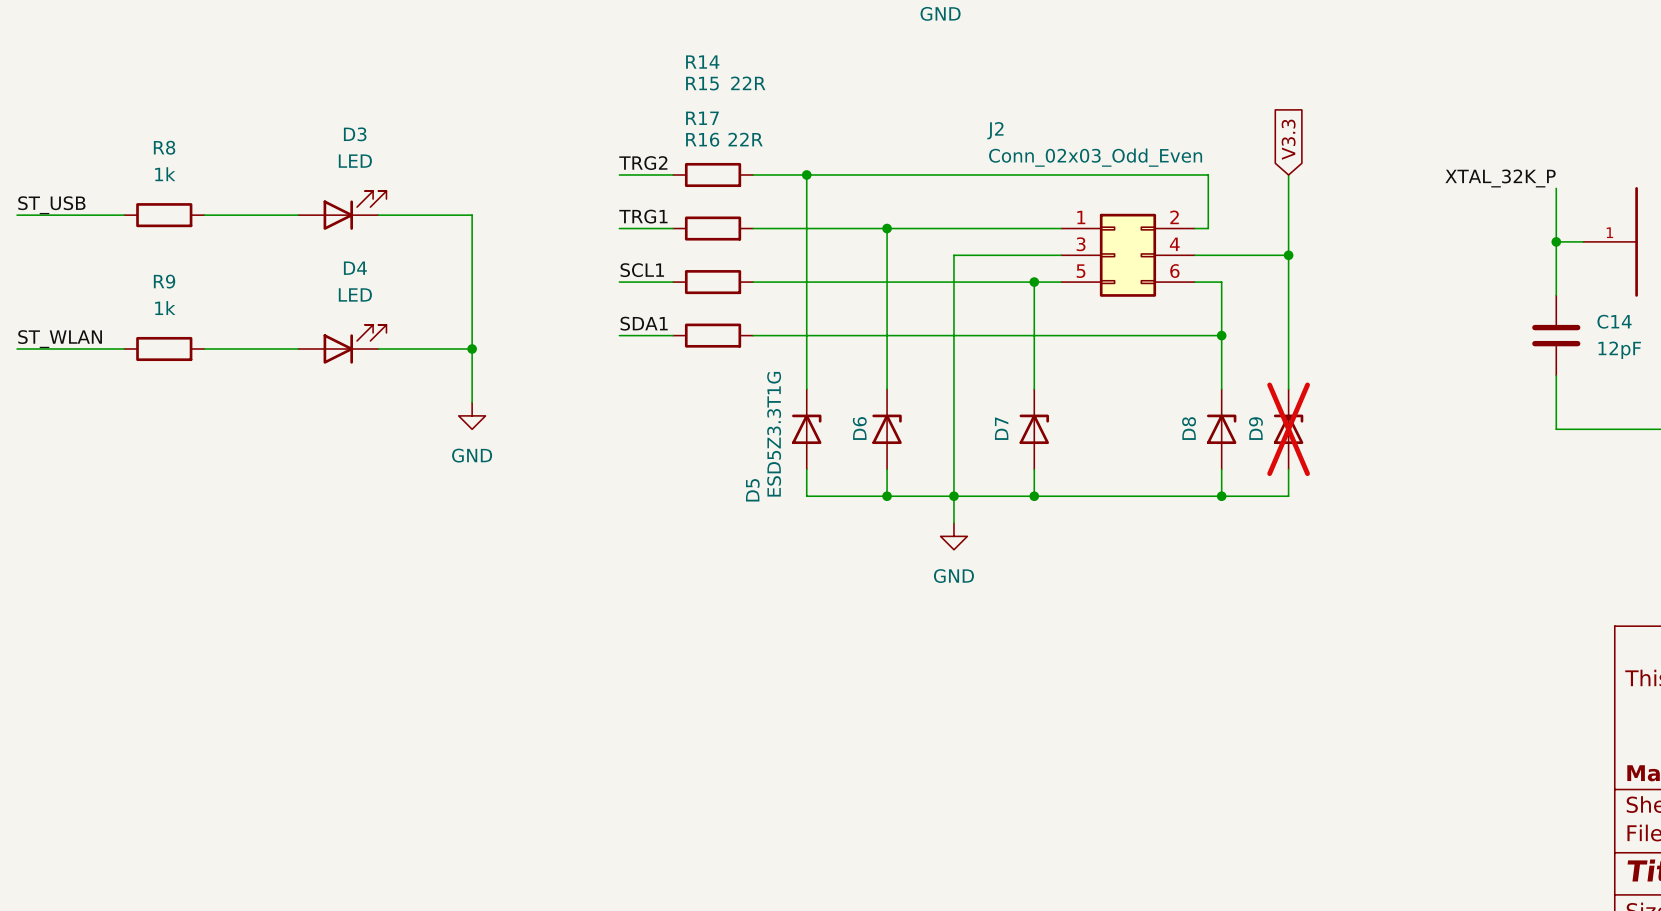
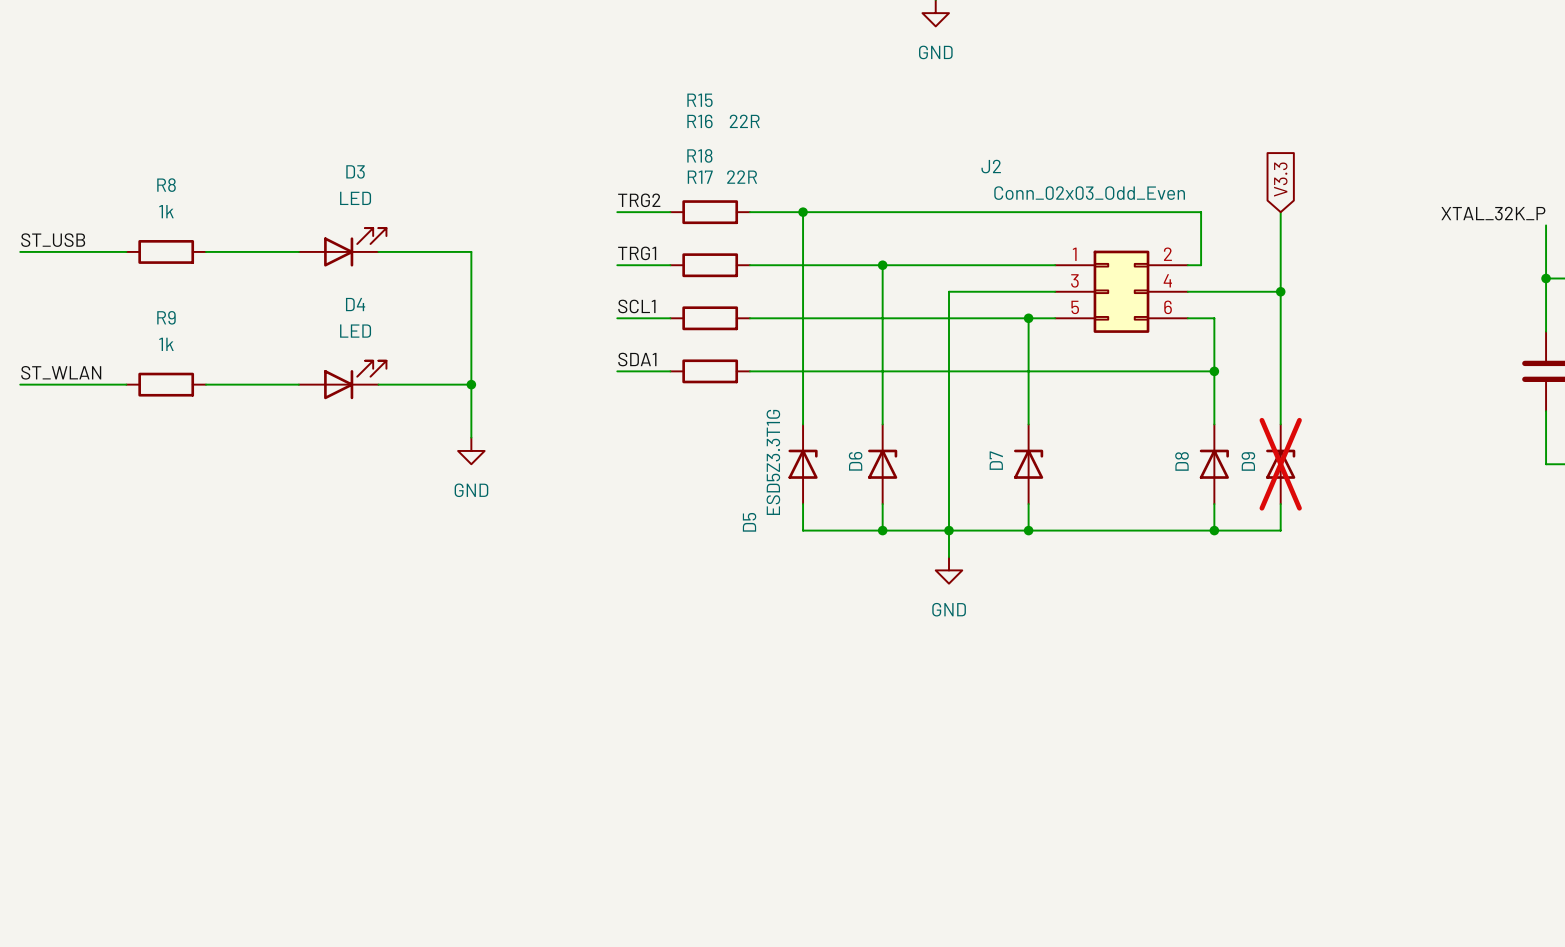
R14 name: R14 (702, 62) -> R15 (699, 100)
R15 name: R15 (702, 83) -> R16 (699, 121)
R17 name: R17 (702, 118) -> R18 (699, 155)
R16 name: R16 (702, 139) -> R17 (700, 177)
D6 value: ESD5Z3.3T1G (774, 434) -> none
D5 value: none -> ESD5Z3.3T1G (773, 462)

